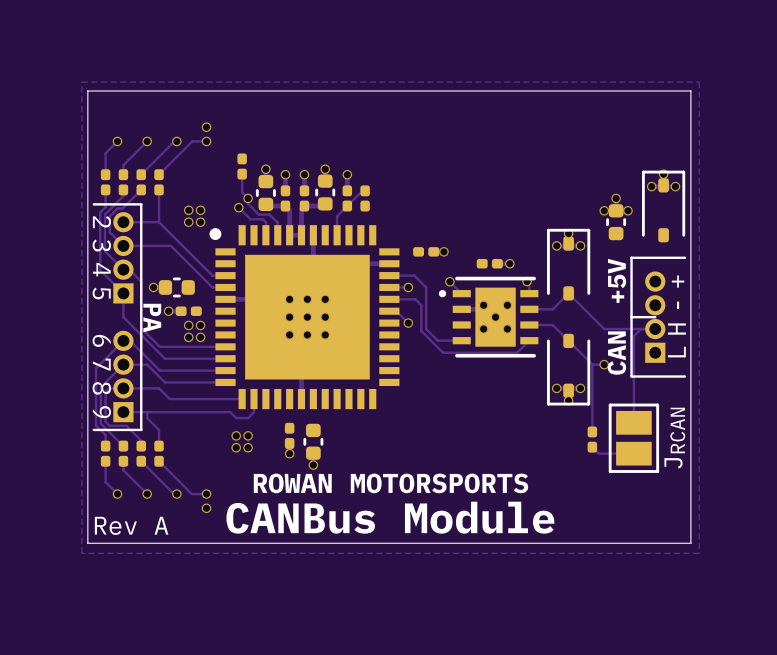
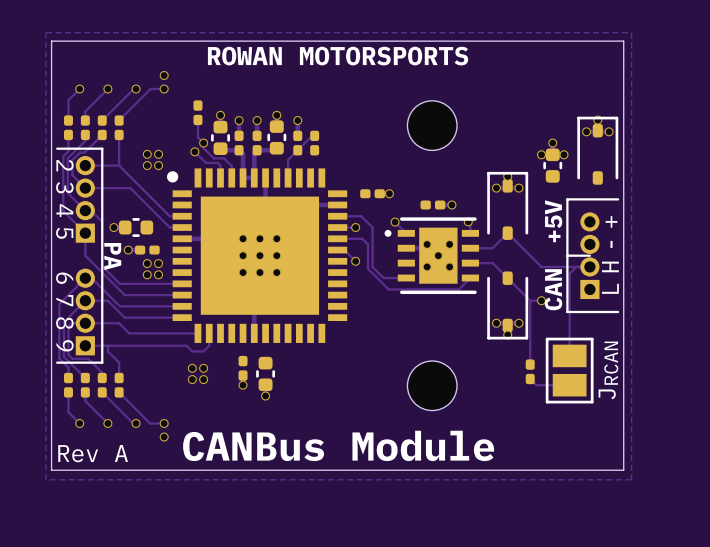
part: none -> (432, 125)
part: none -> (432, 385)
text position: ROWAN MOTORSPORTS (390, 483) -> ROWAN MOTORSPORTS (338, 56)

